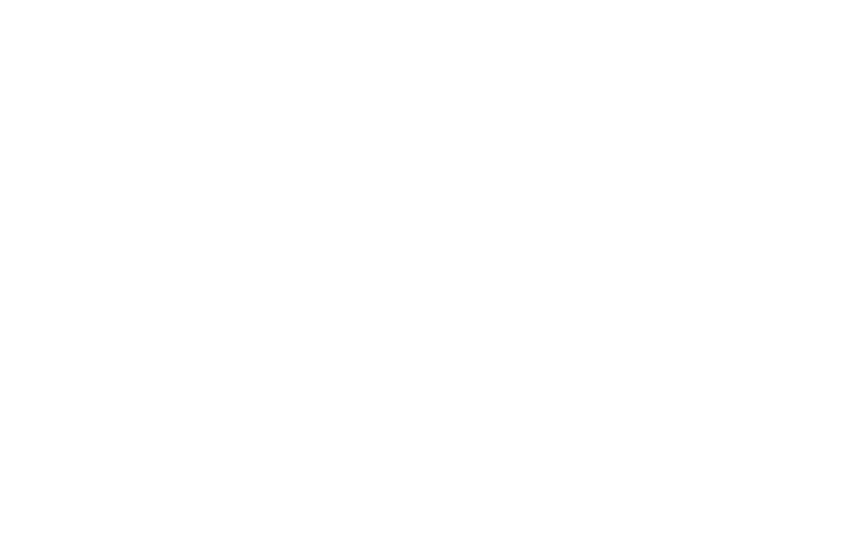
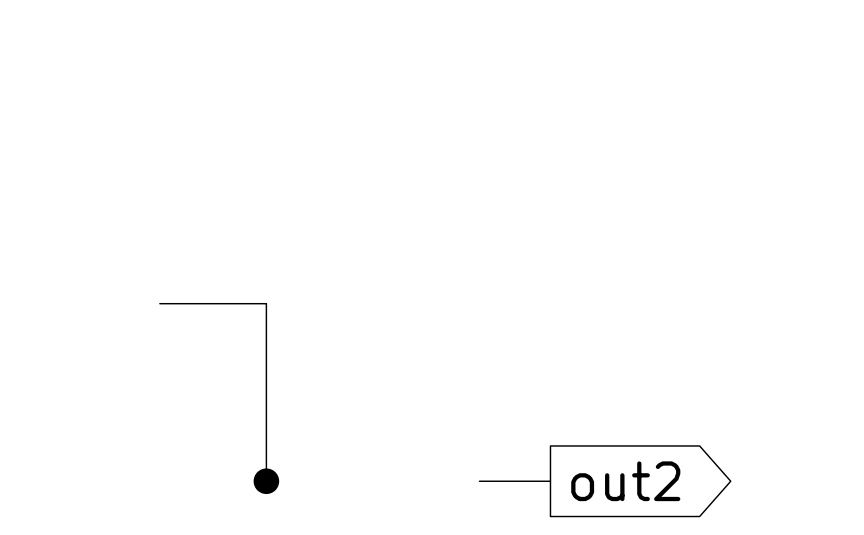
wire: none -> (159, 303) (266, 303) (266, 481)
junction: none -> (266, 481)
wire: none -> (479, 481) (550, 481)
global label: none -> out2 (625, 481)

